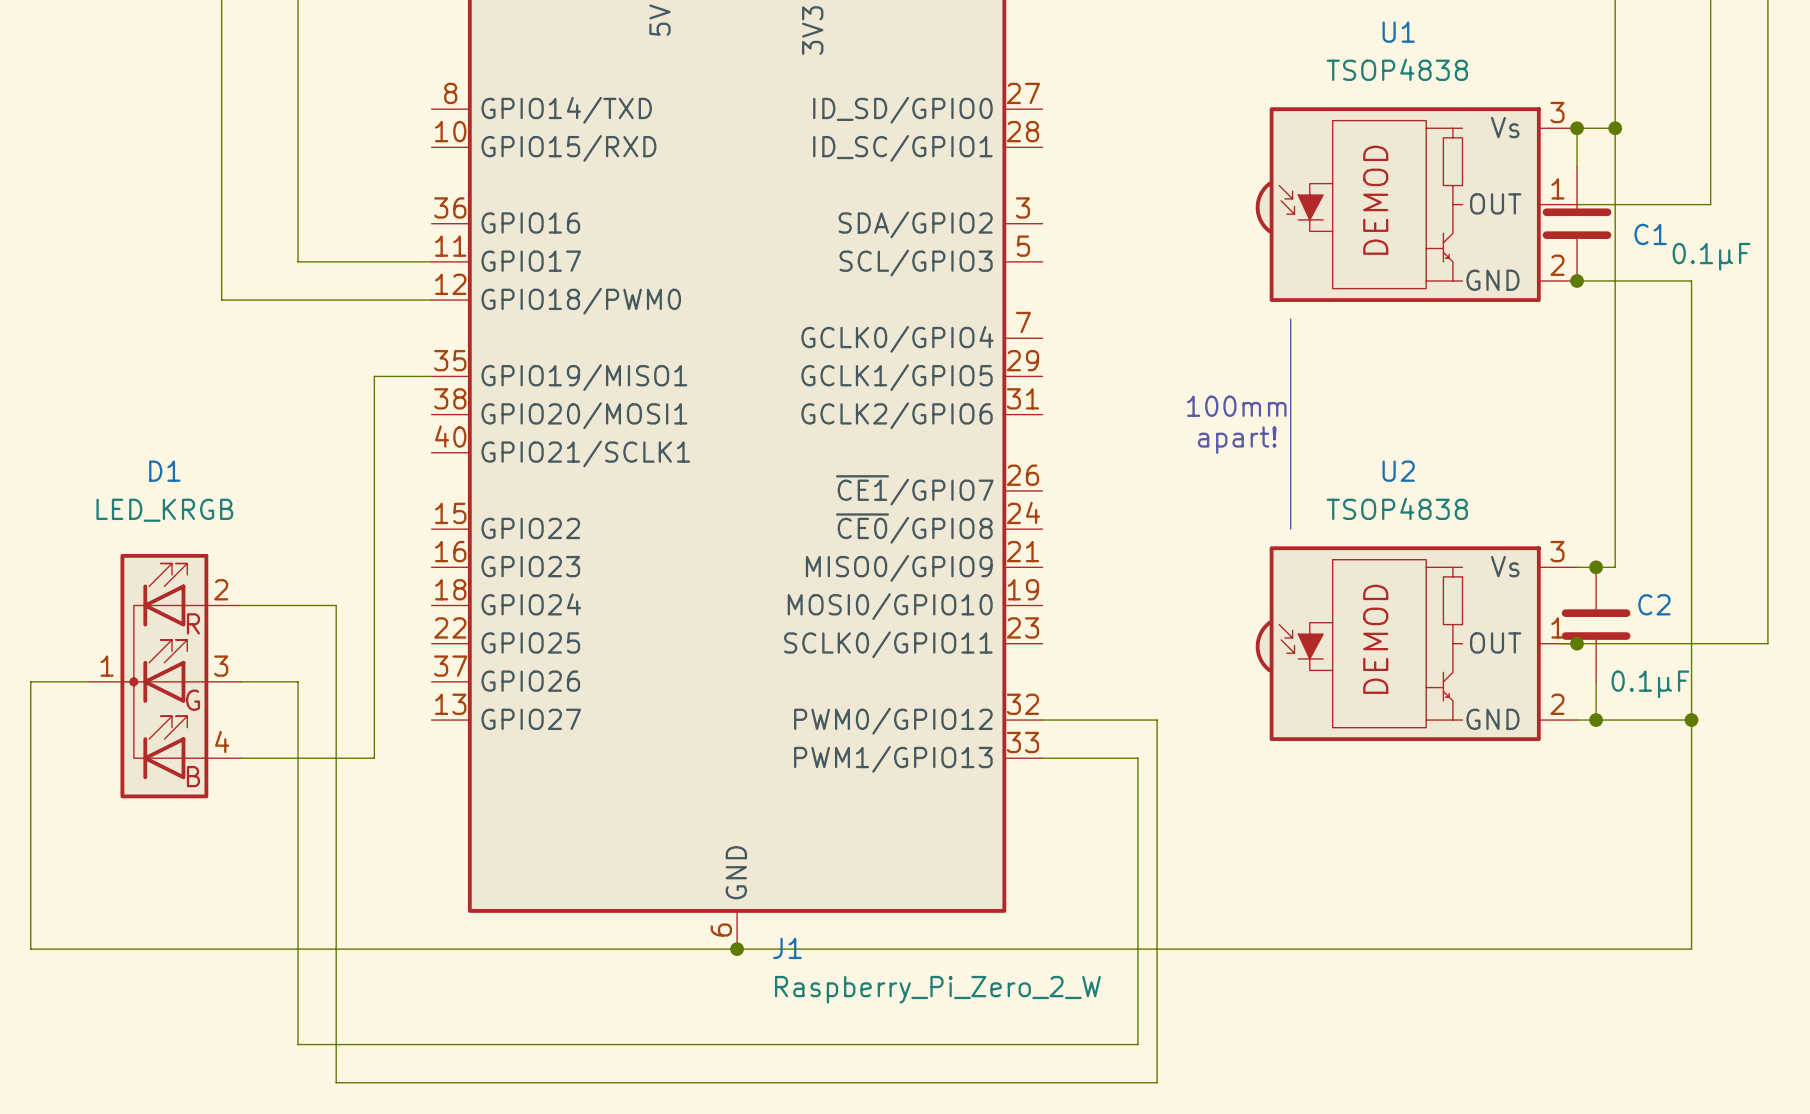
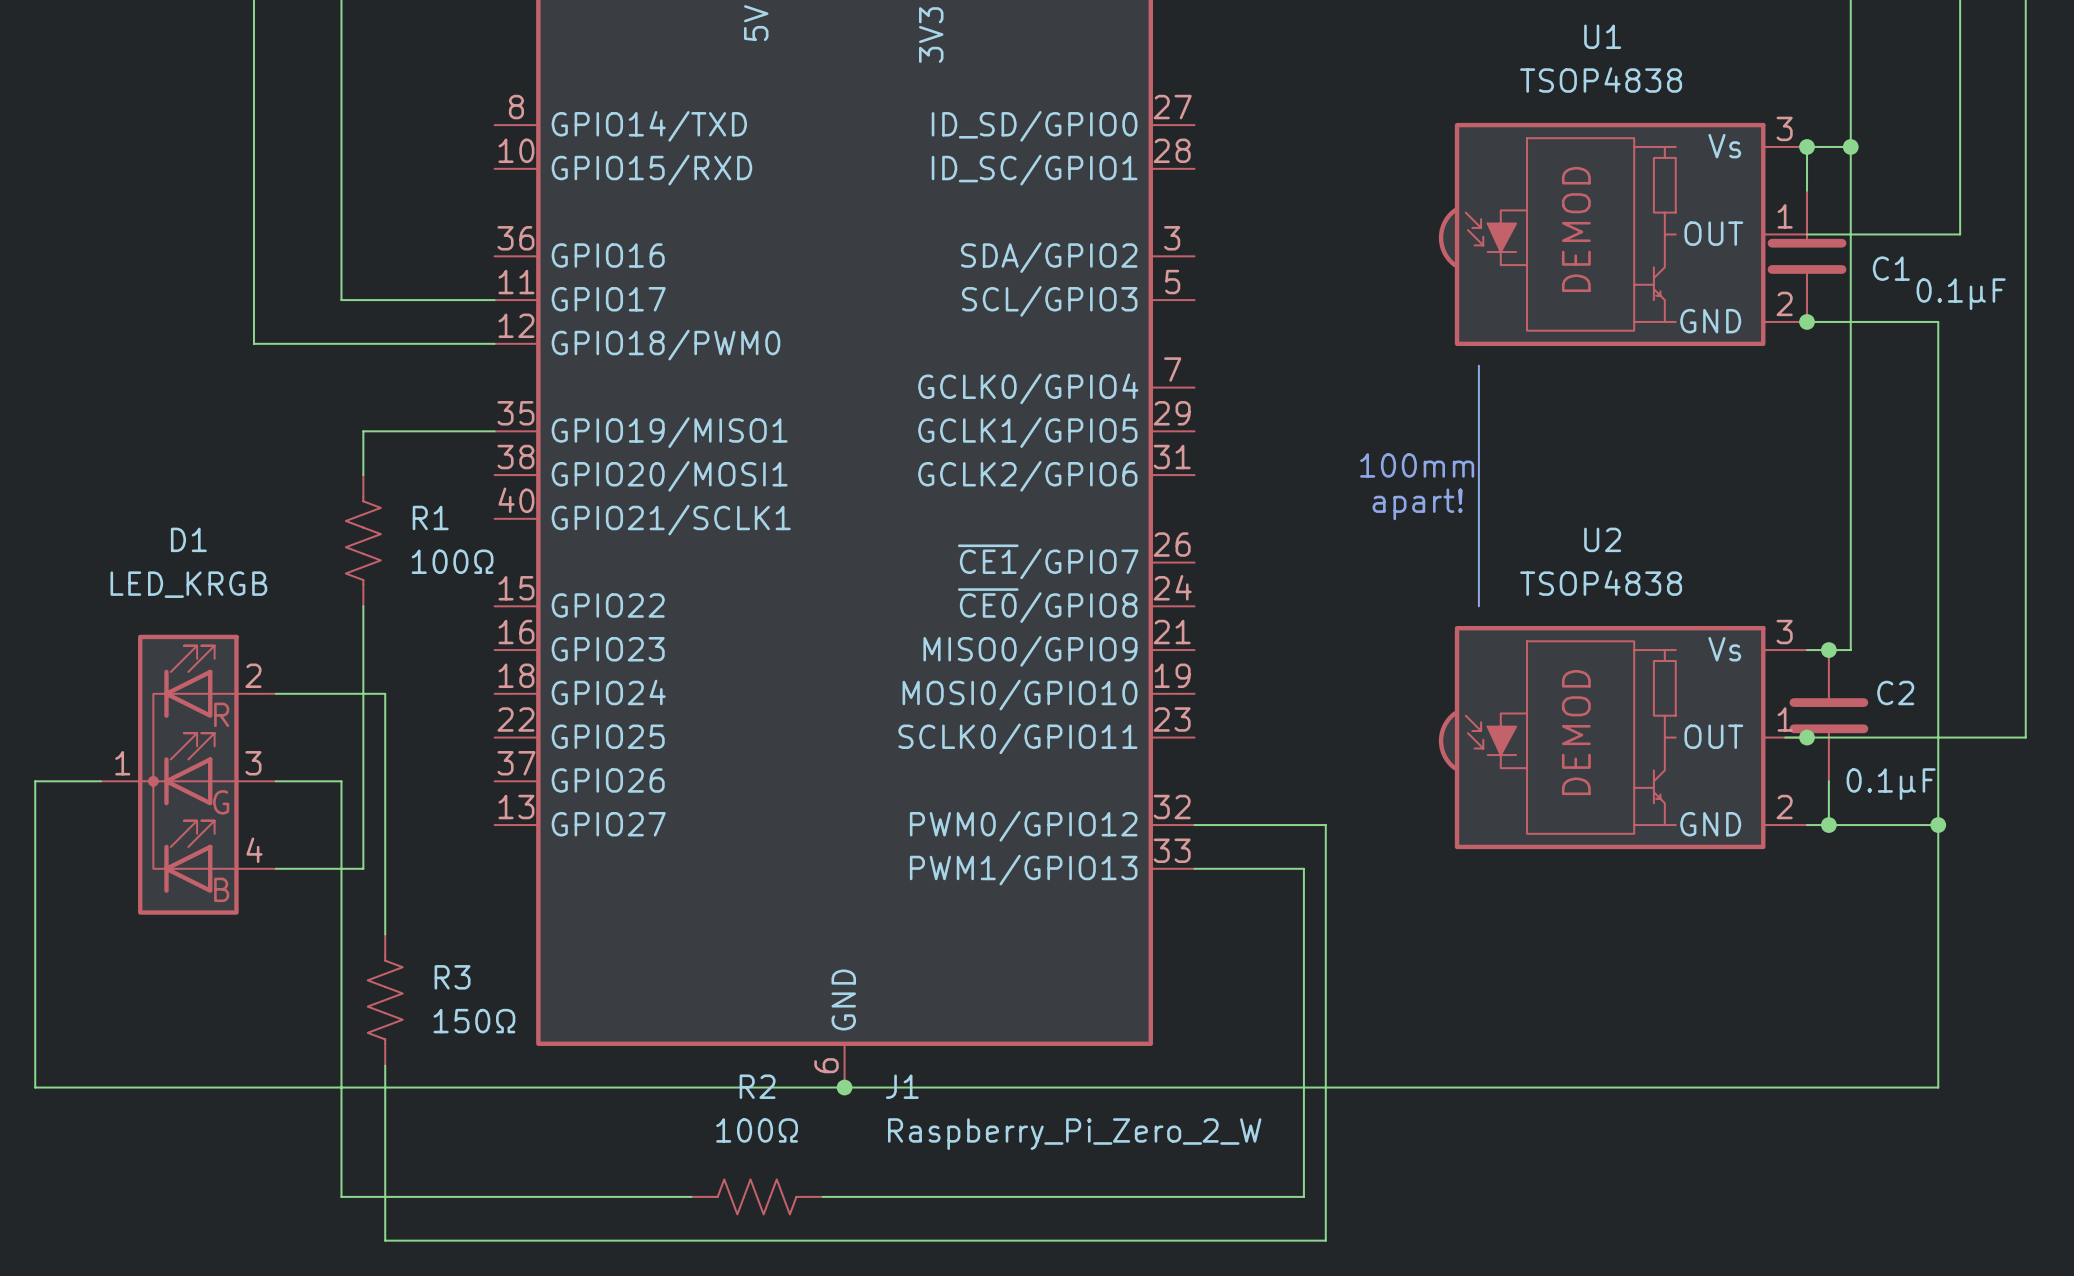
wire: (374, 376) (374, 758) (317, 758) -> (363, 606) (363, 868)
wire: none -> (428, 431) (363, 431) (363, 475)
R1: none -> 100Ω (363, 540)
wire: (336, 815) (336, 930) -> none
R3: none -> 150Ω (385, 1000)
wire: (603, 1044) (717, 1044) -> none
R2: none -> 100Ω (757, 1196)

